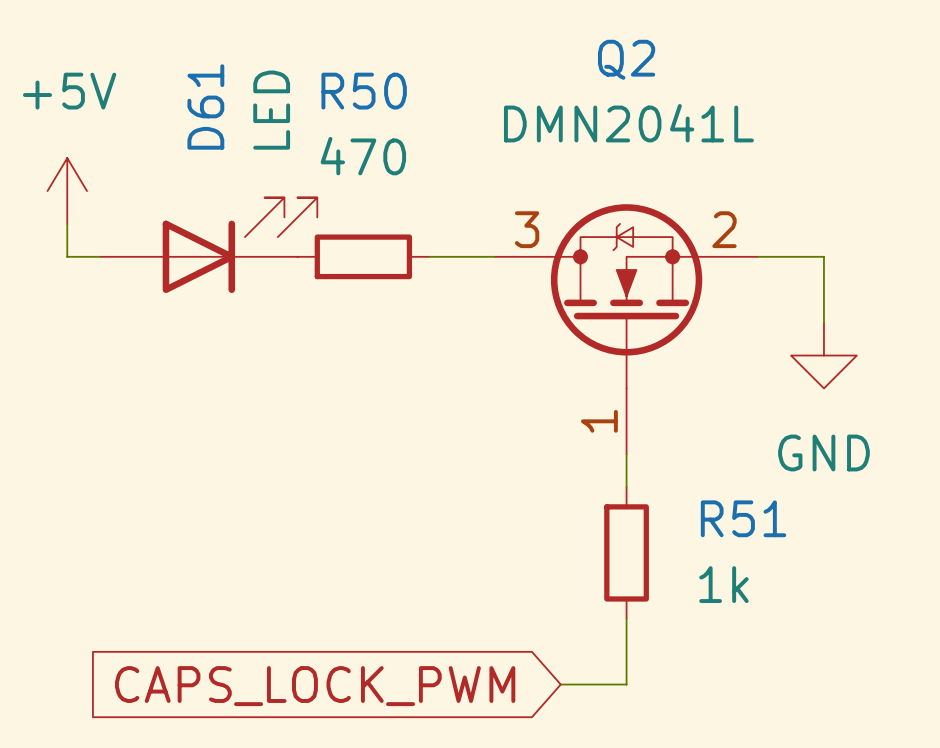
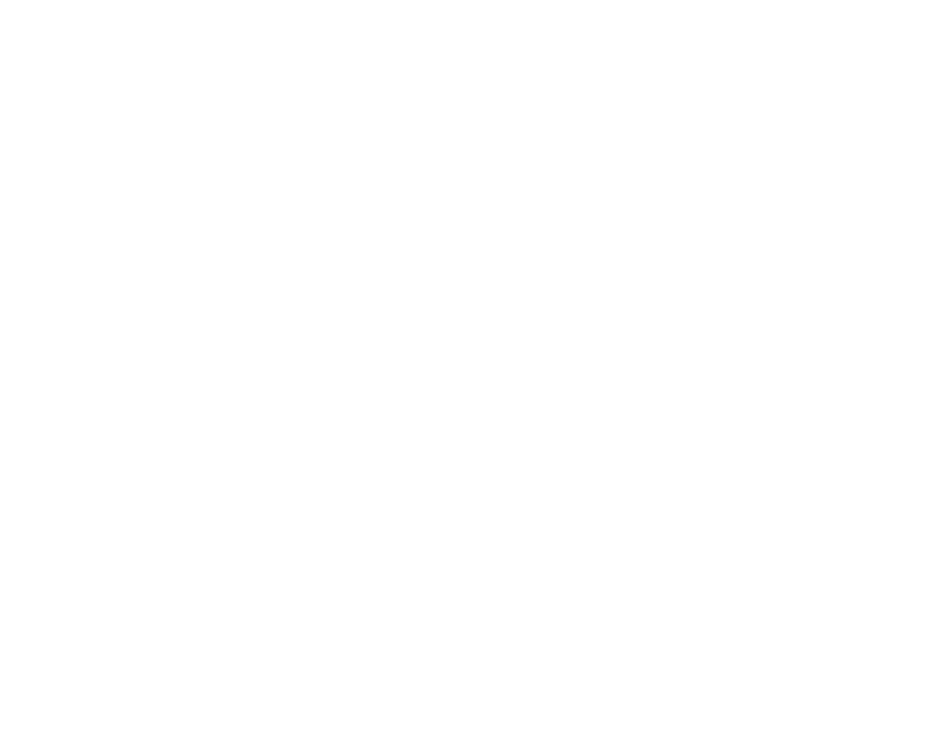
power symbol: +5V (67, 191) -> none
wire: (67, 223) (67, 256) (100, 256) -> none
D61: LED (208, 245) -> none
R50: 470 (363, 256) -> none
wire: (429, 256) (494, 256) -> none
wire: (758, 256) (823, 256) (823, 322) -> none
Q2: DMN2041L (626, 329) -> none
power symbol: GND (823, 355) -> none
wire: (626, 454) (626, 487) -> none
R51: 1k (626, 552) -> none
wire: (626, 618) (626, 684) (560, 684) -> none
global label: CAPS_LOCK_PWM (315, 686) -> none

